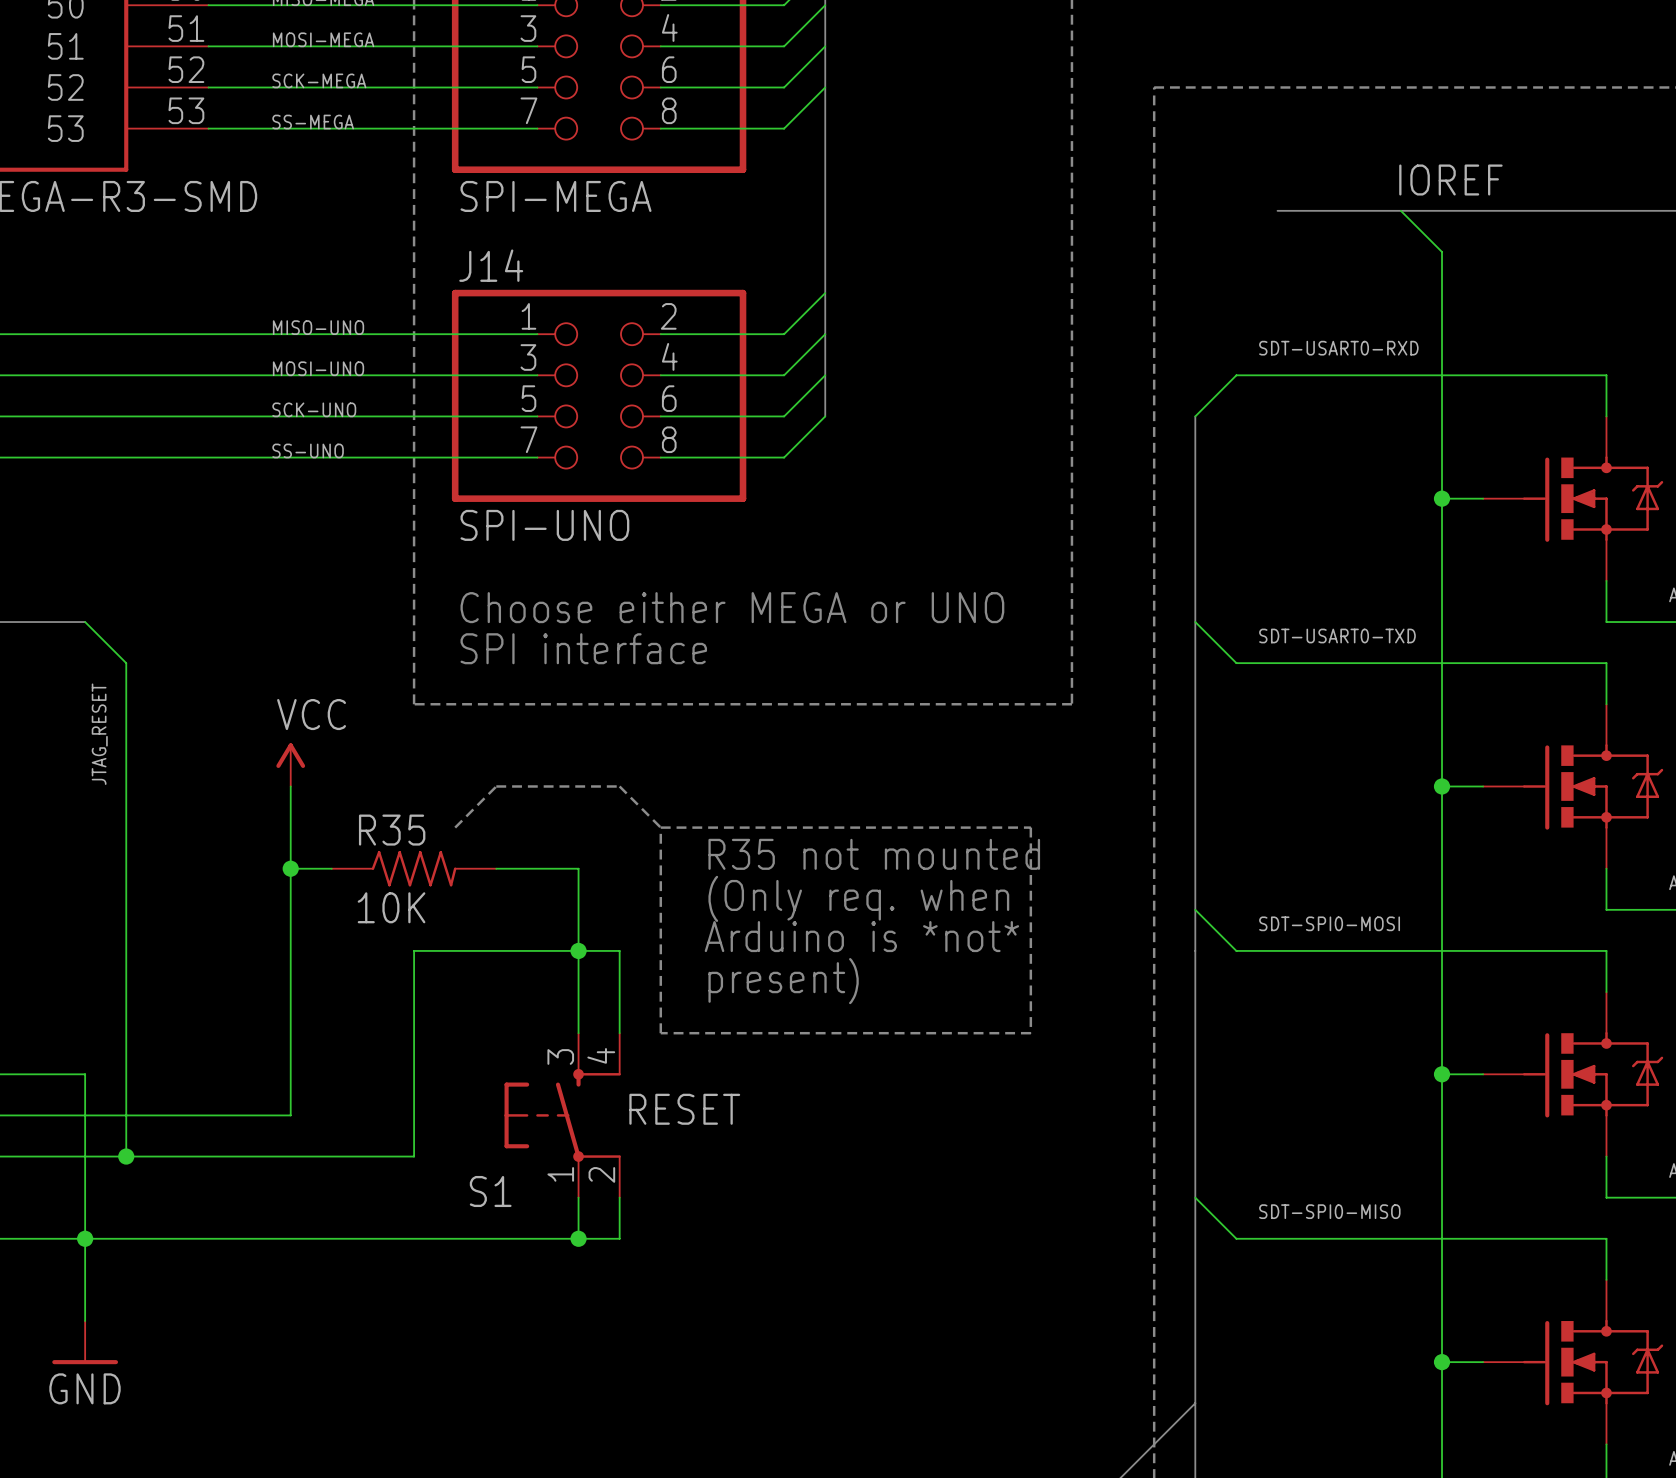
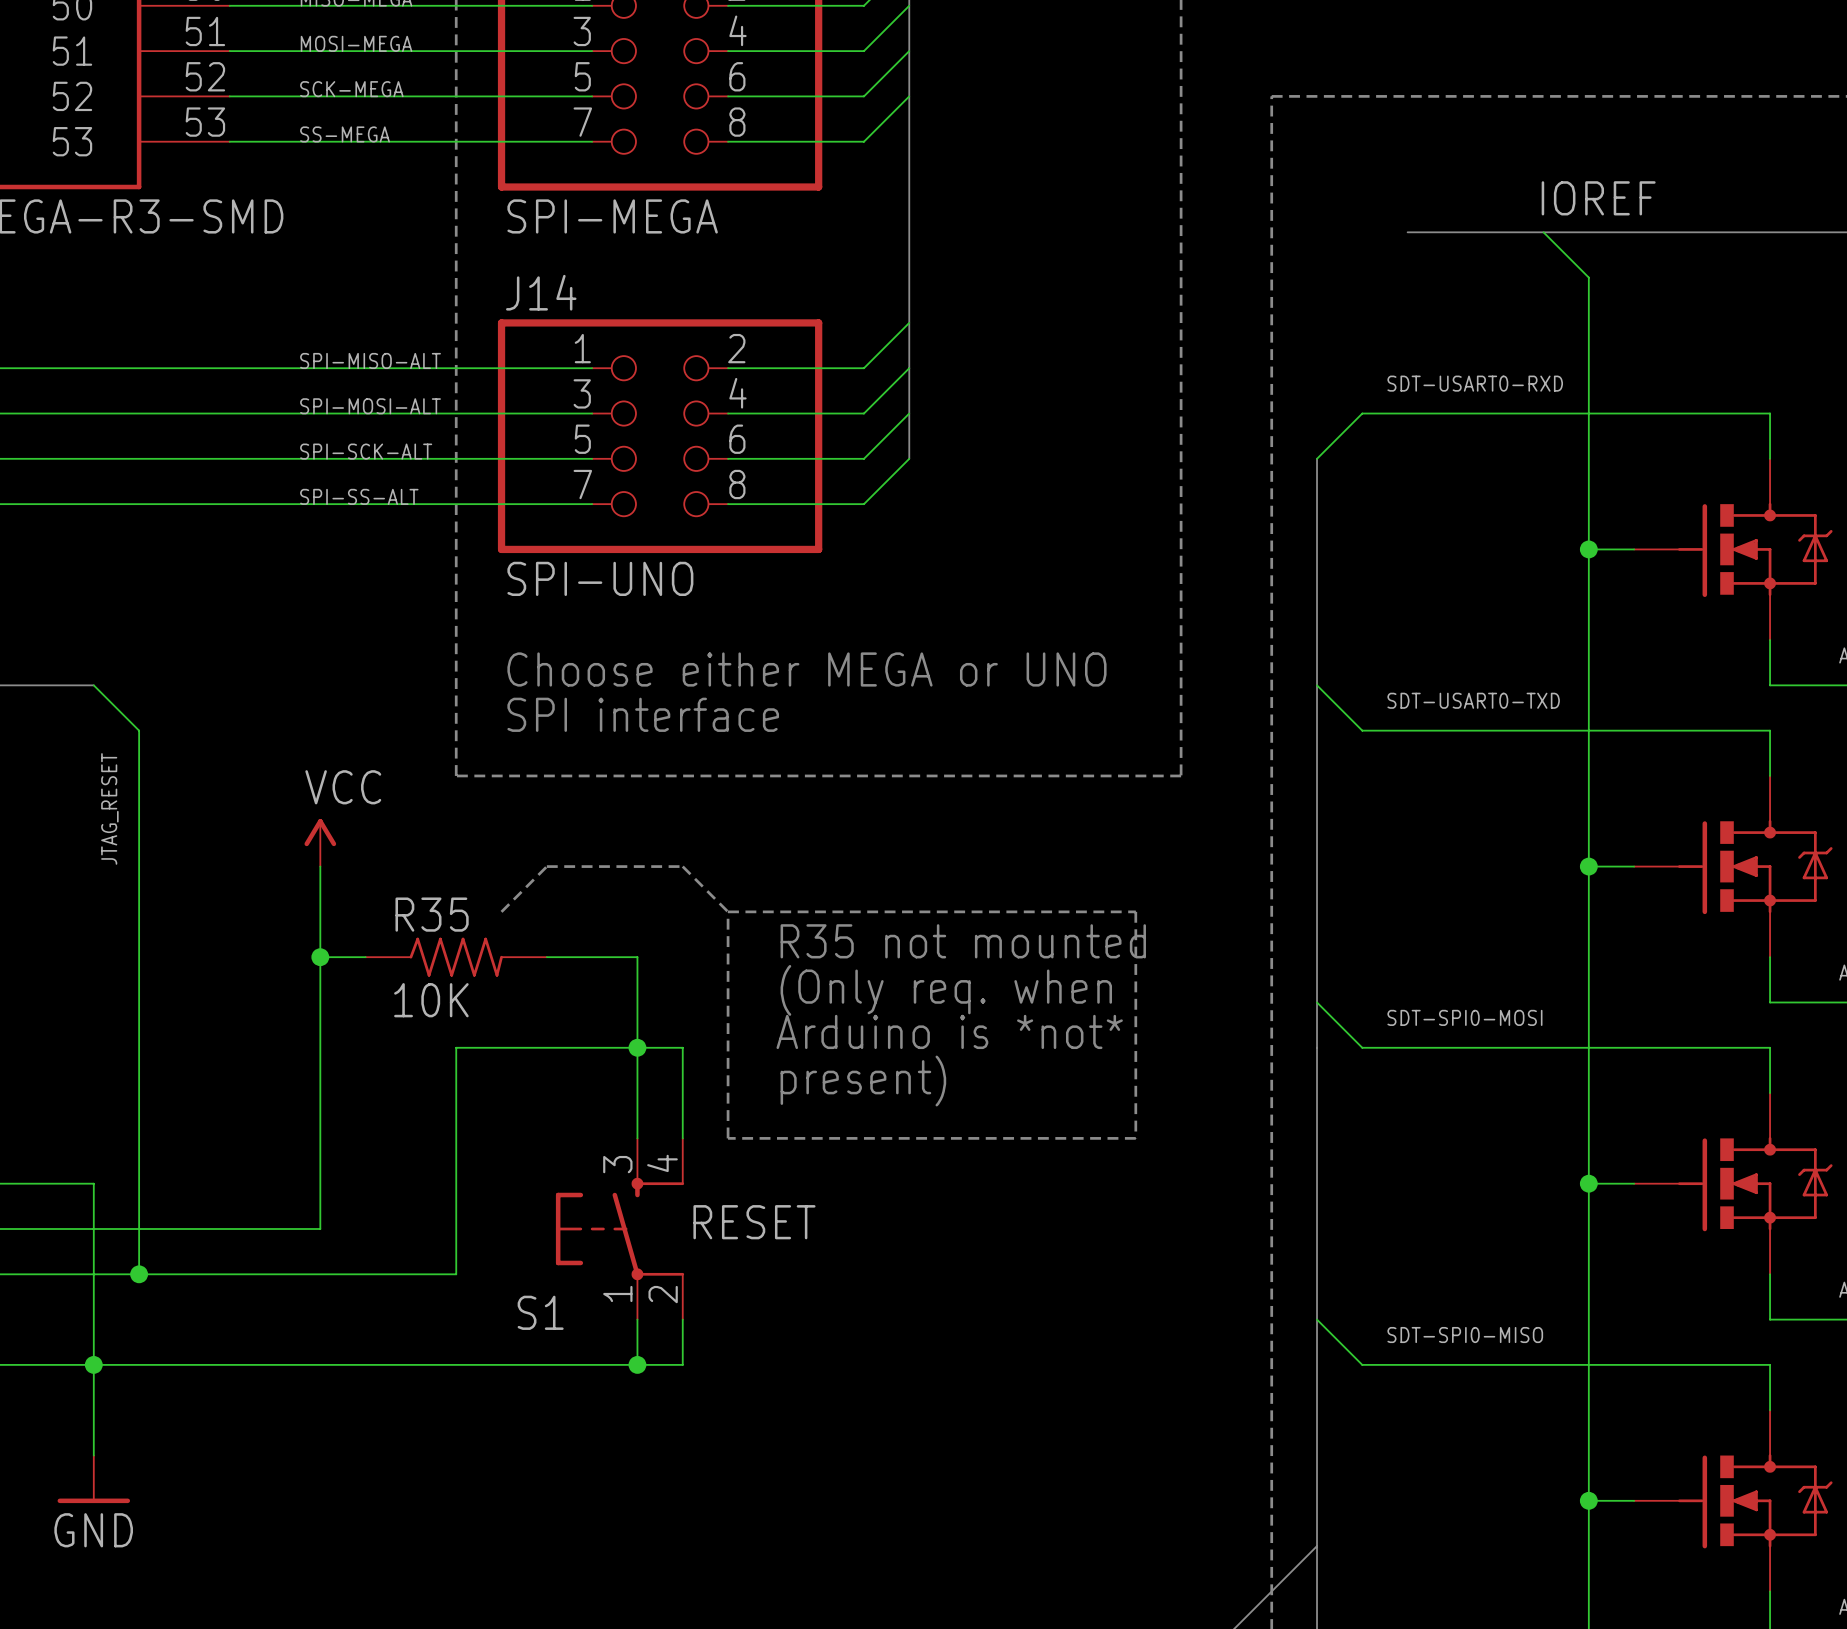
label: MISO-UNO (318, 327) -> SPI-MISO-ALT (370, 360)
label: MOSI-UNO (318, 368) -> SPI-MOSI-ALT (370, 406)
label: SCK-UNO (314, 409) -> SPI-SCK-ALT (366, 451)
label: SS-UNO (308, 450) -> SPI-SS-ALT (359, 496)

